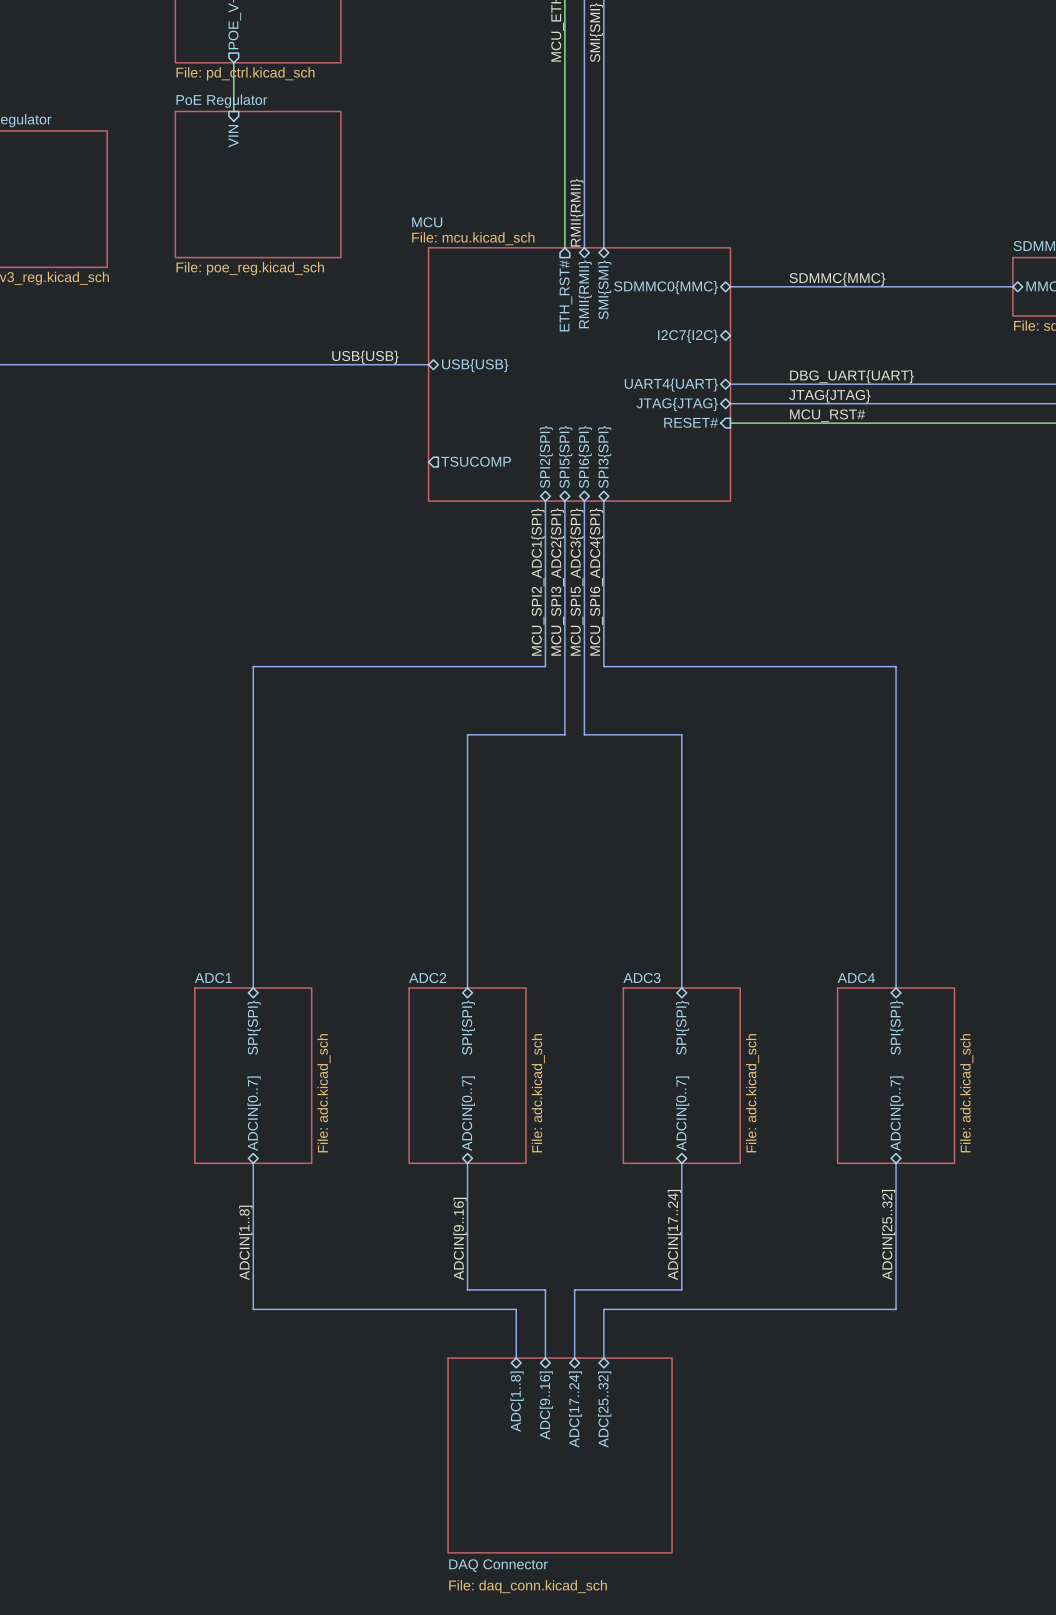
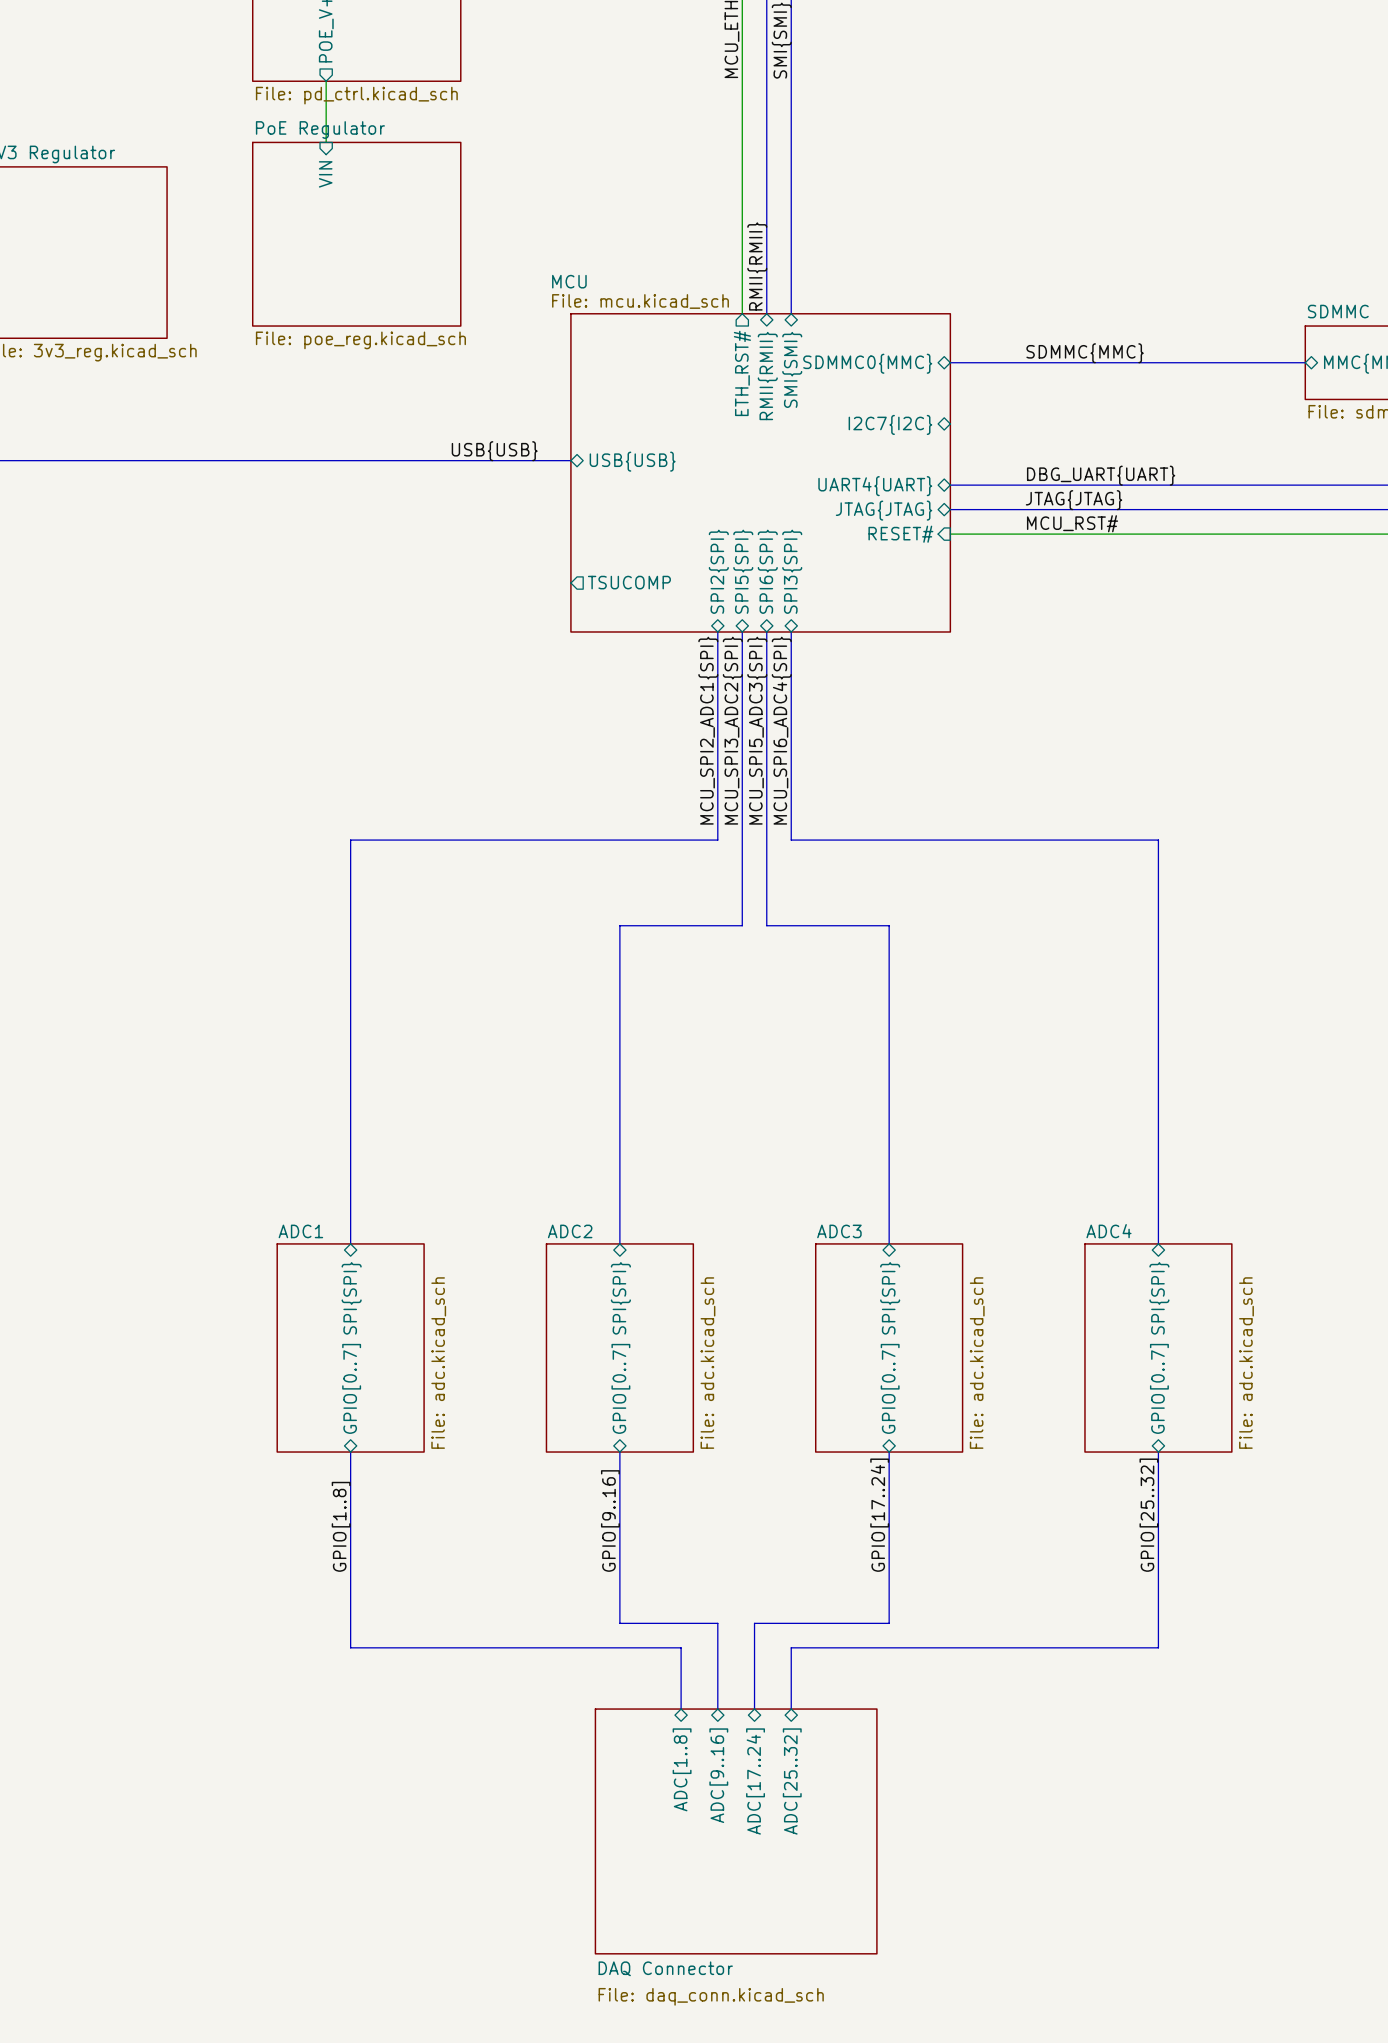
sheet ADC1 shape: [194, 987, 313, 1164] -> [276, 1243, 425, 1453]
sheet ADC2 shape: [408, 987, 527, 1164] -> [545, 1243, 695, 1453]
sheet ADC3 shape: [622, 987, 741, 1164] -> [814, 1243, 964, 1453]
sheet ADC4 shape: [837, 987, 956, 1164] -> [1084, 1243, 1233, 1453]
sheet pin: ADCIN[0..7] (254, 1113) -> GPIO[0..7] (351, 1388)
sheet pin: ADCIN[0..7] (468, 1113) -> GPIO[0..7] (620, 1388)
sheet pin: ADCIN[0..7] (682, 1113) -> GPIO[0..7] (890, 1388)
sheet pin: ADCIN[0..7] (896, 1113) -> GPIO[0..7] (1159, 1388)
bus: none -> (350, 1452) (350, 1464)
bus: none -> (619, 1452) (619, 1464)
bus: none -> (889, 1452) (889, 1464)
bus: none -> (1158, 1452) (1158, 1464)
label: ADCIN[17..24] (674, 1235) -> GPIO[17..24] (879, 1515)
label: ADCIN[25..32] (888, 1235) -> GPIO[25..32] (1148, 1515)
label: ADCIN[9..16] (460, 1238) -> GPIO[9..16] (610, 1520)
label: ADCIN[1..8] (245, 1242) -> GPIO[1..8] (341, 1526)

